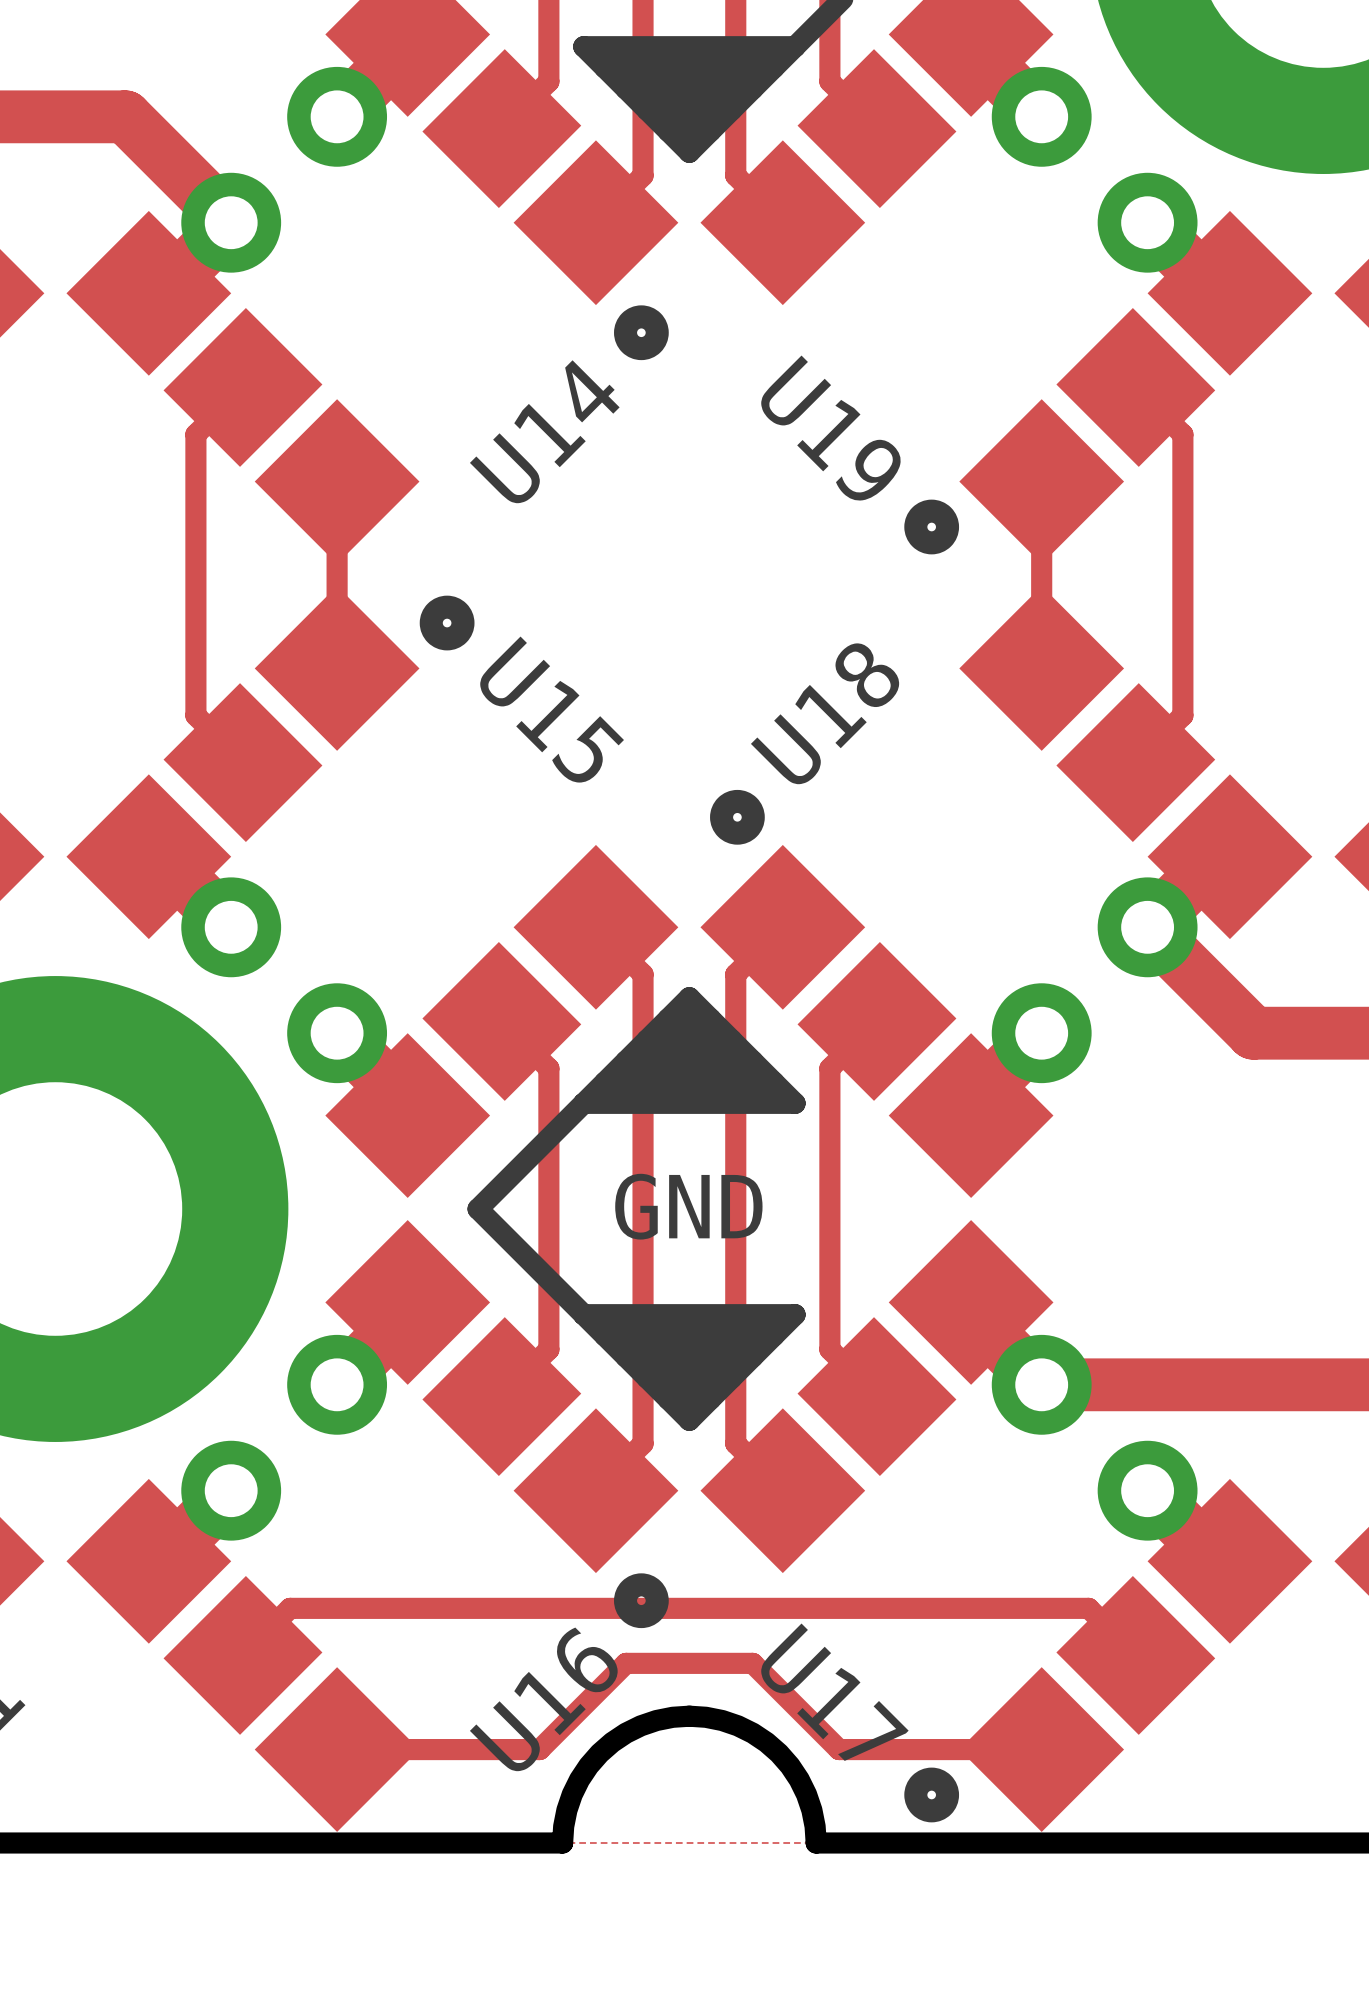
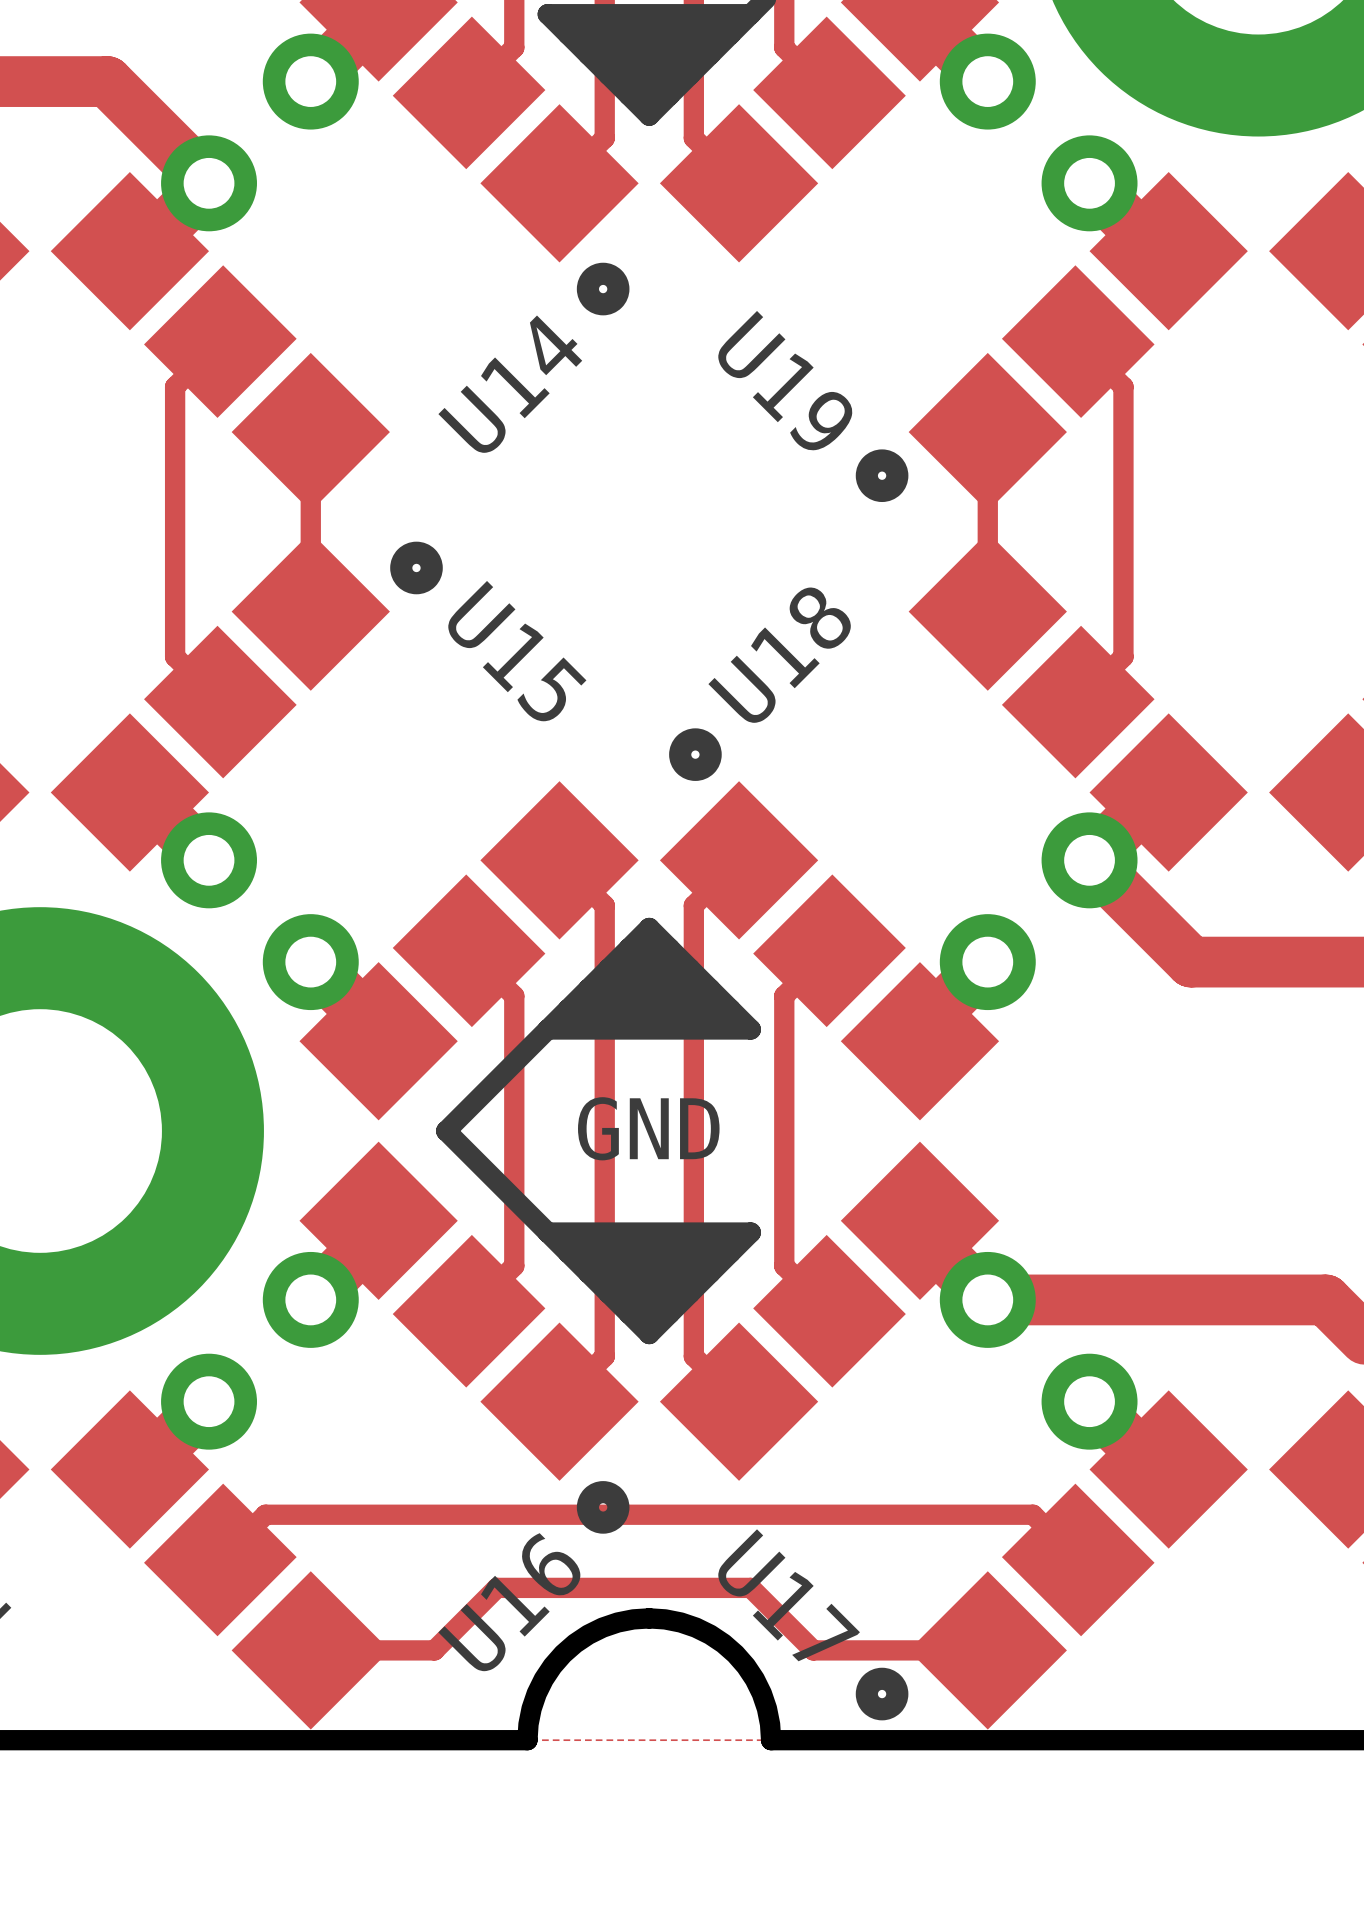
track: (465, 1749) (539, 1749) (625, 1663) (752, 1663) (838, 1749) (860, 1749) -> (434, 1650) (496, 1587) (750, 1587) (813, 1650)

